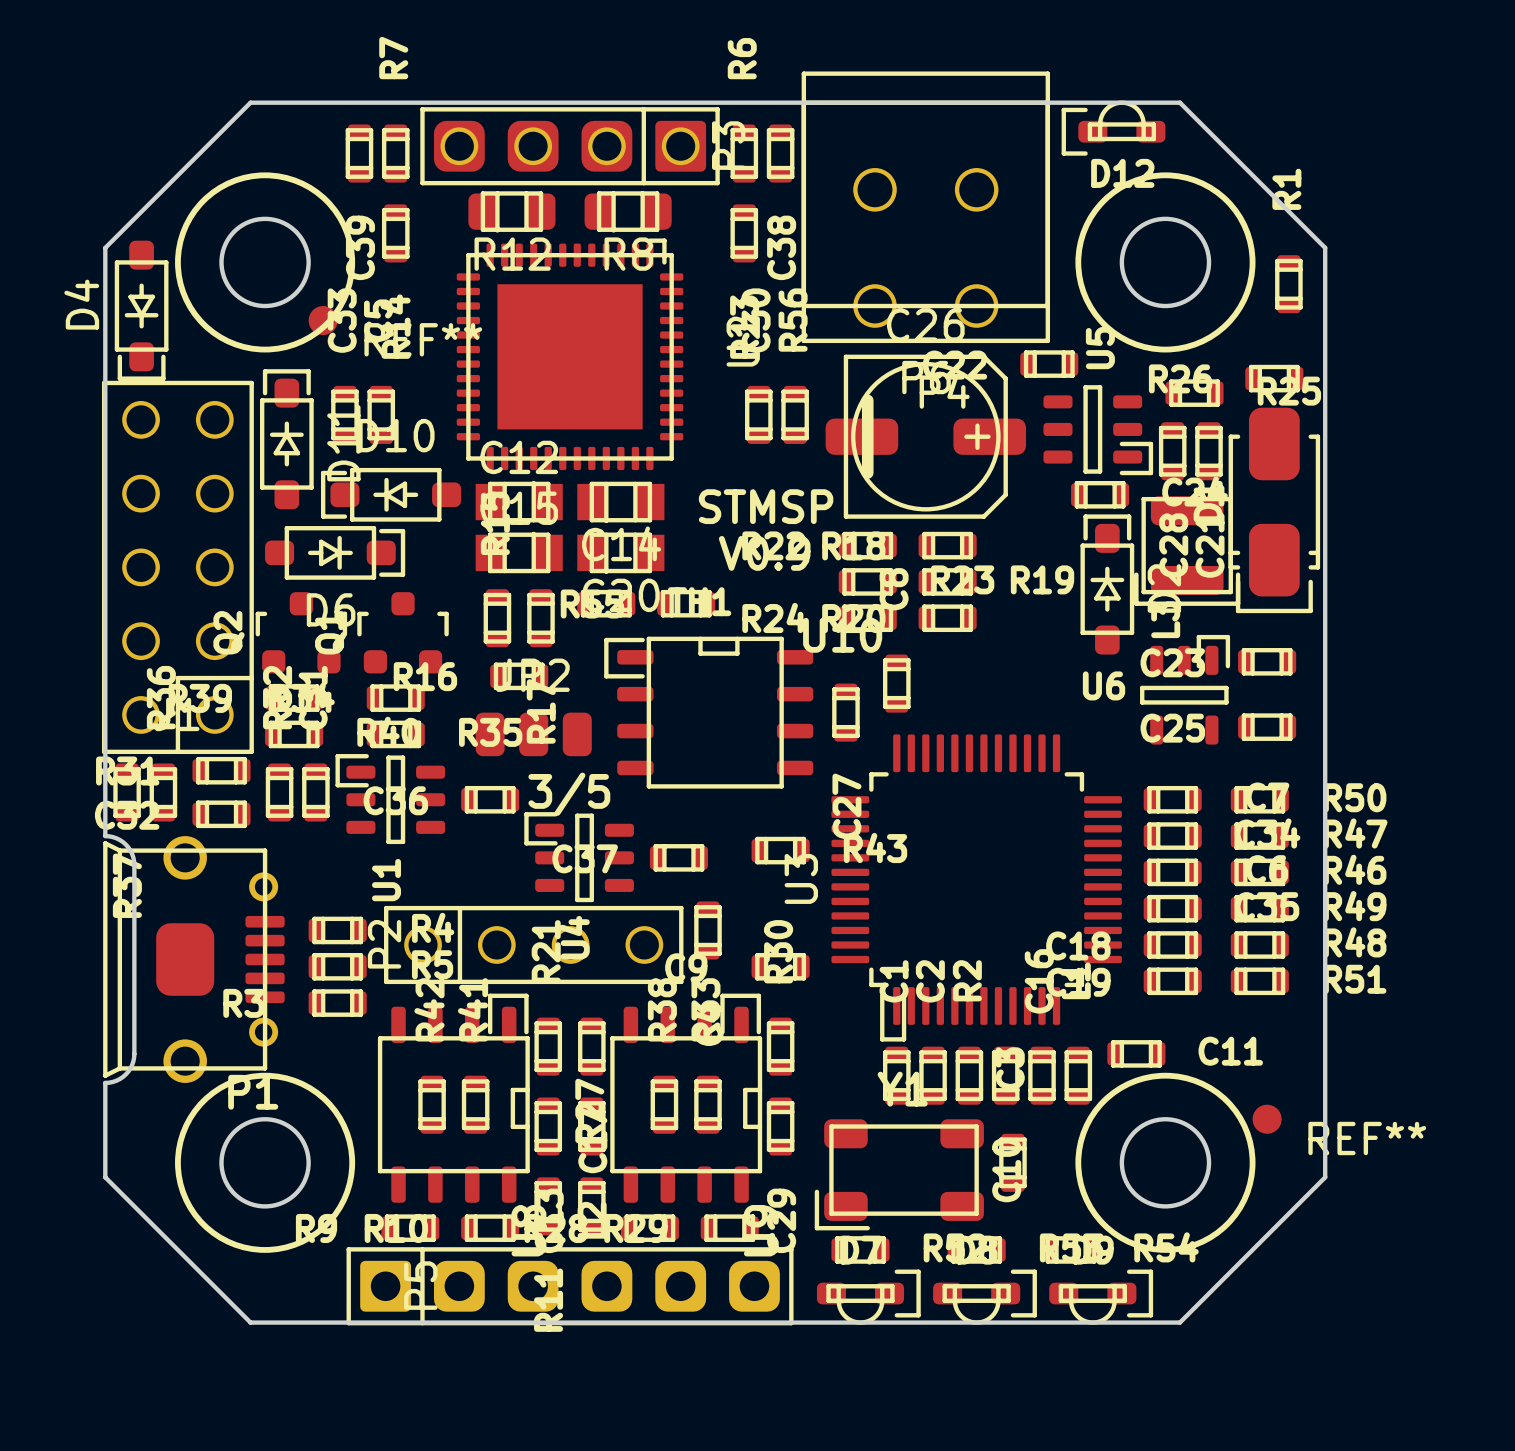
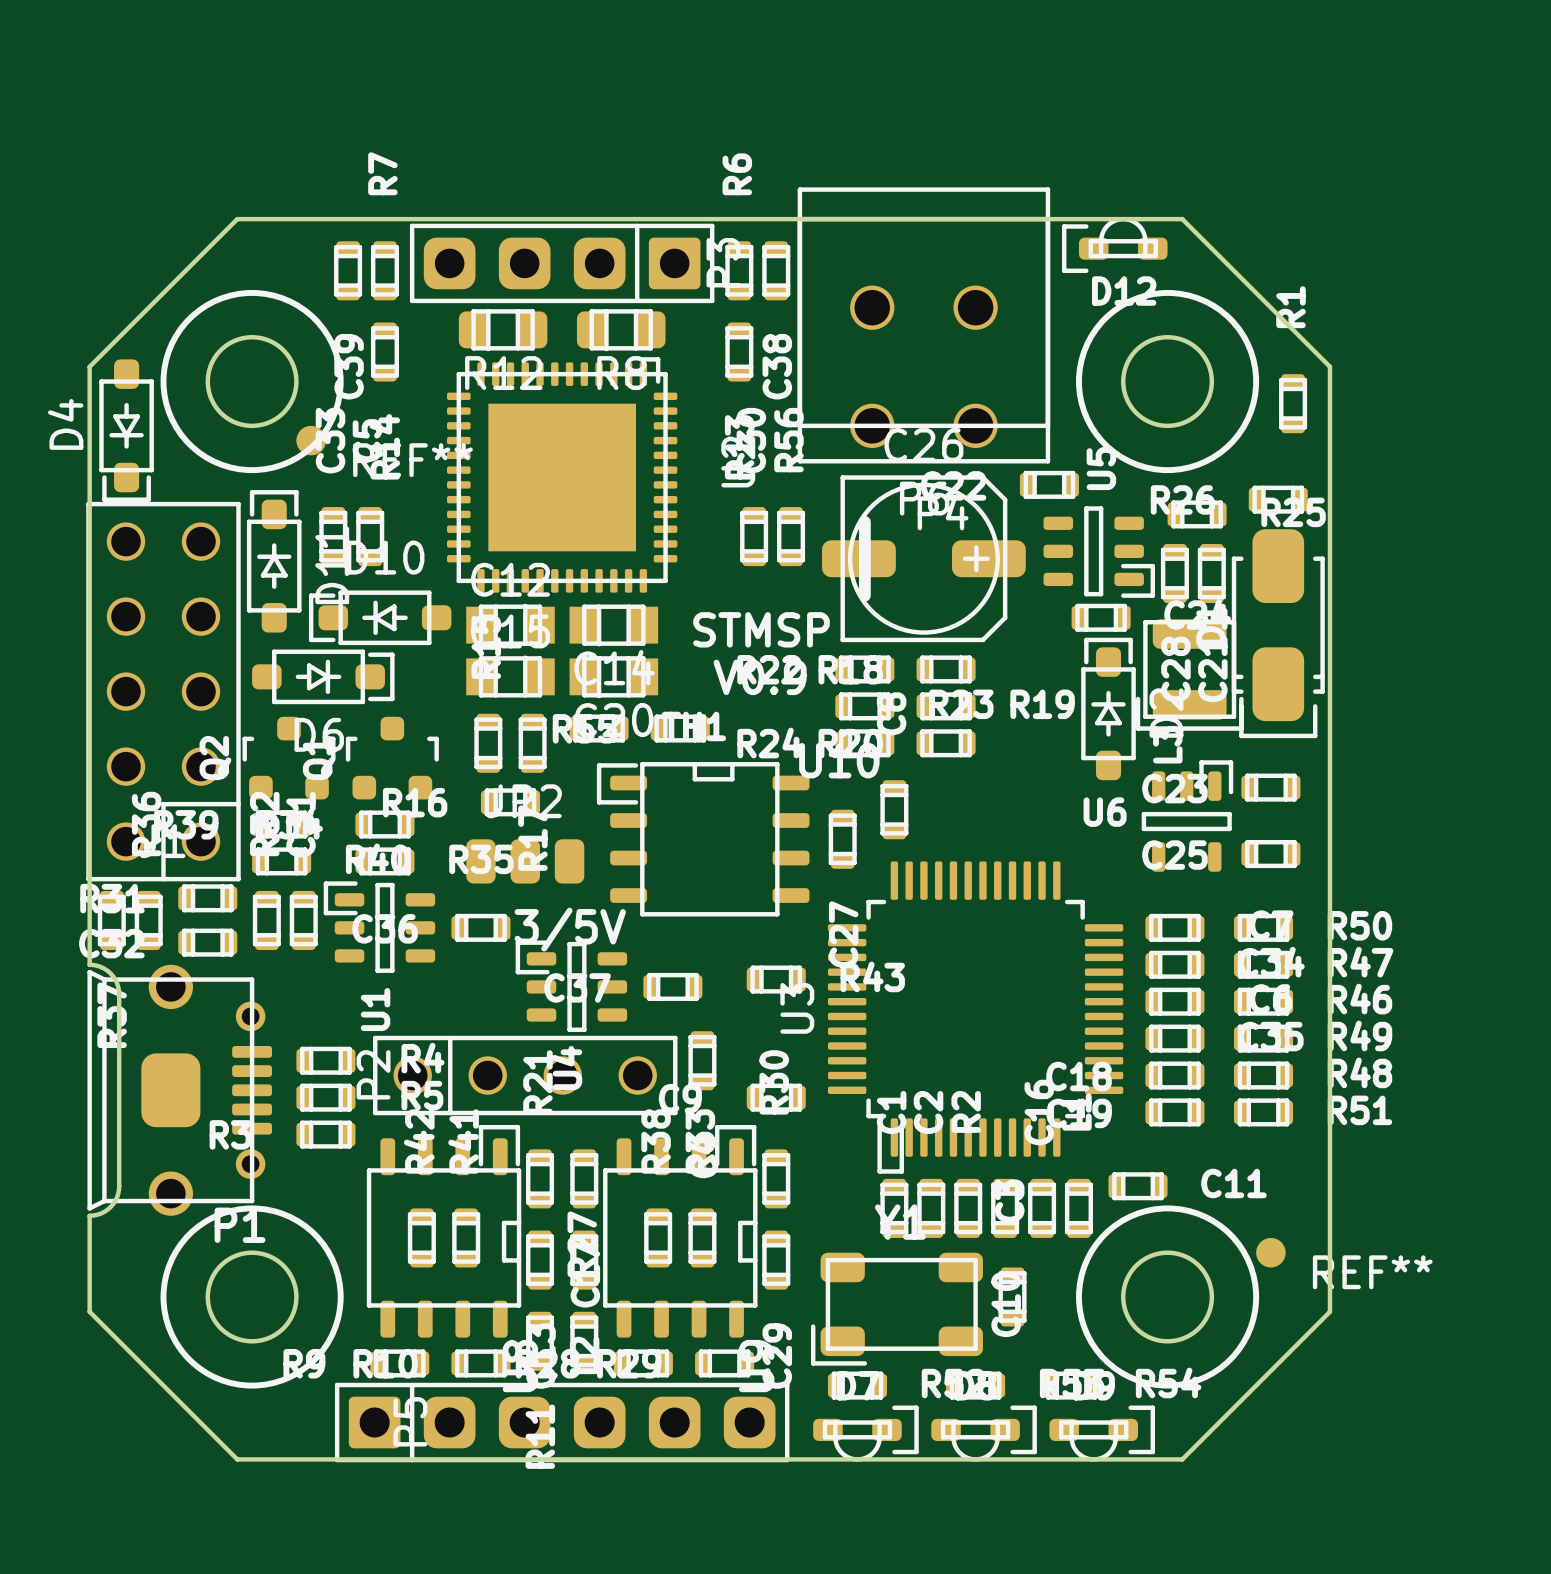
text: 3/5 (569, 794) -> 3/5V (570, 929)

